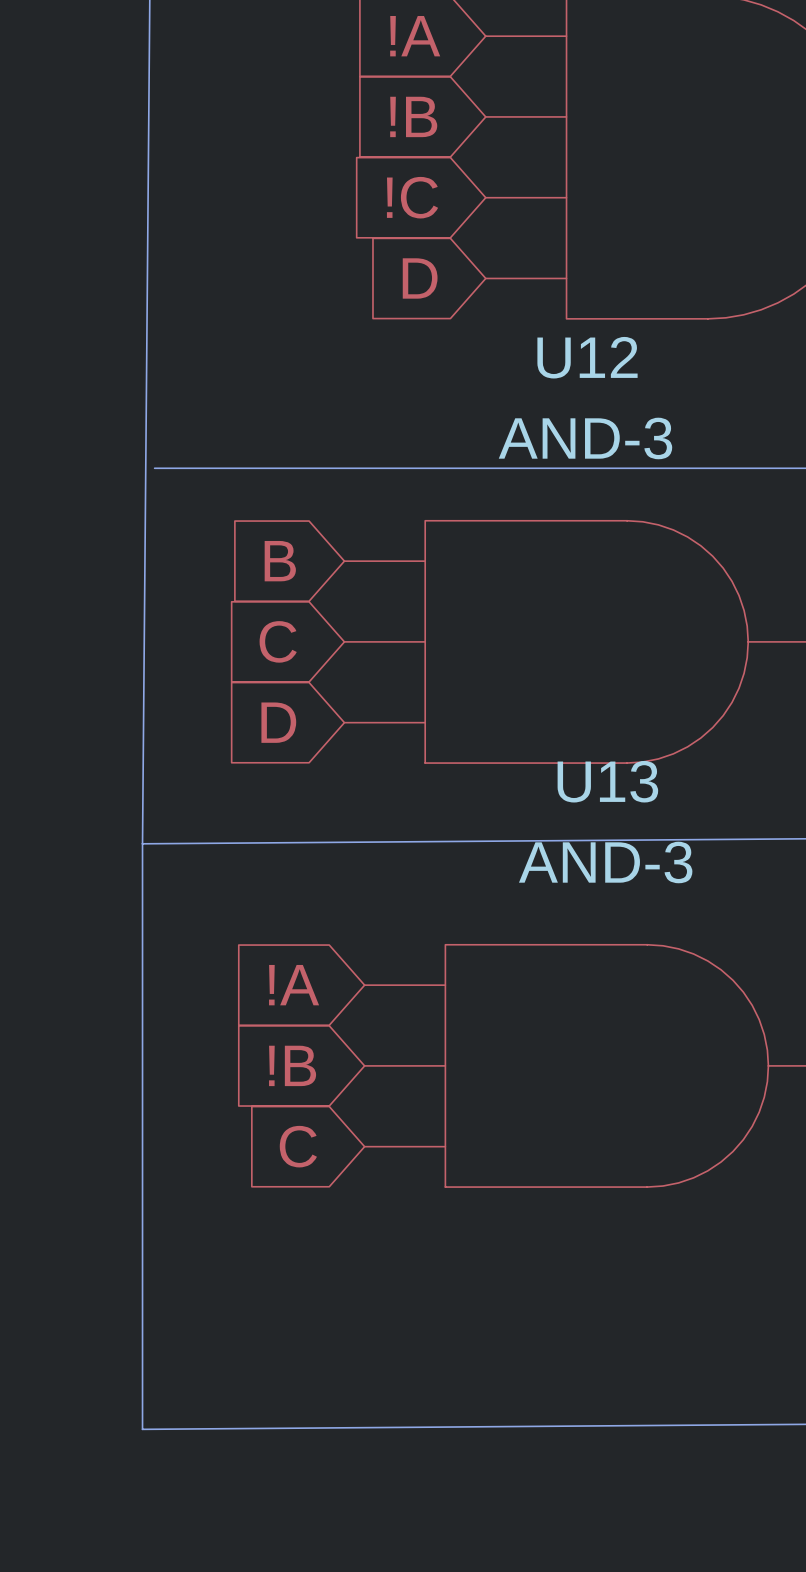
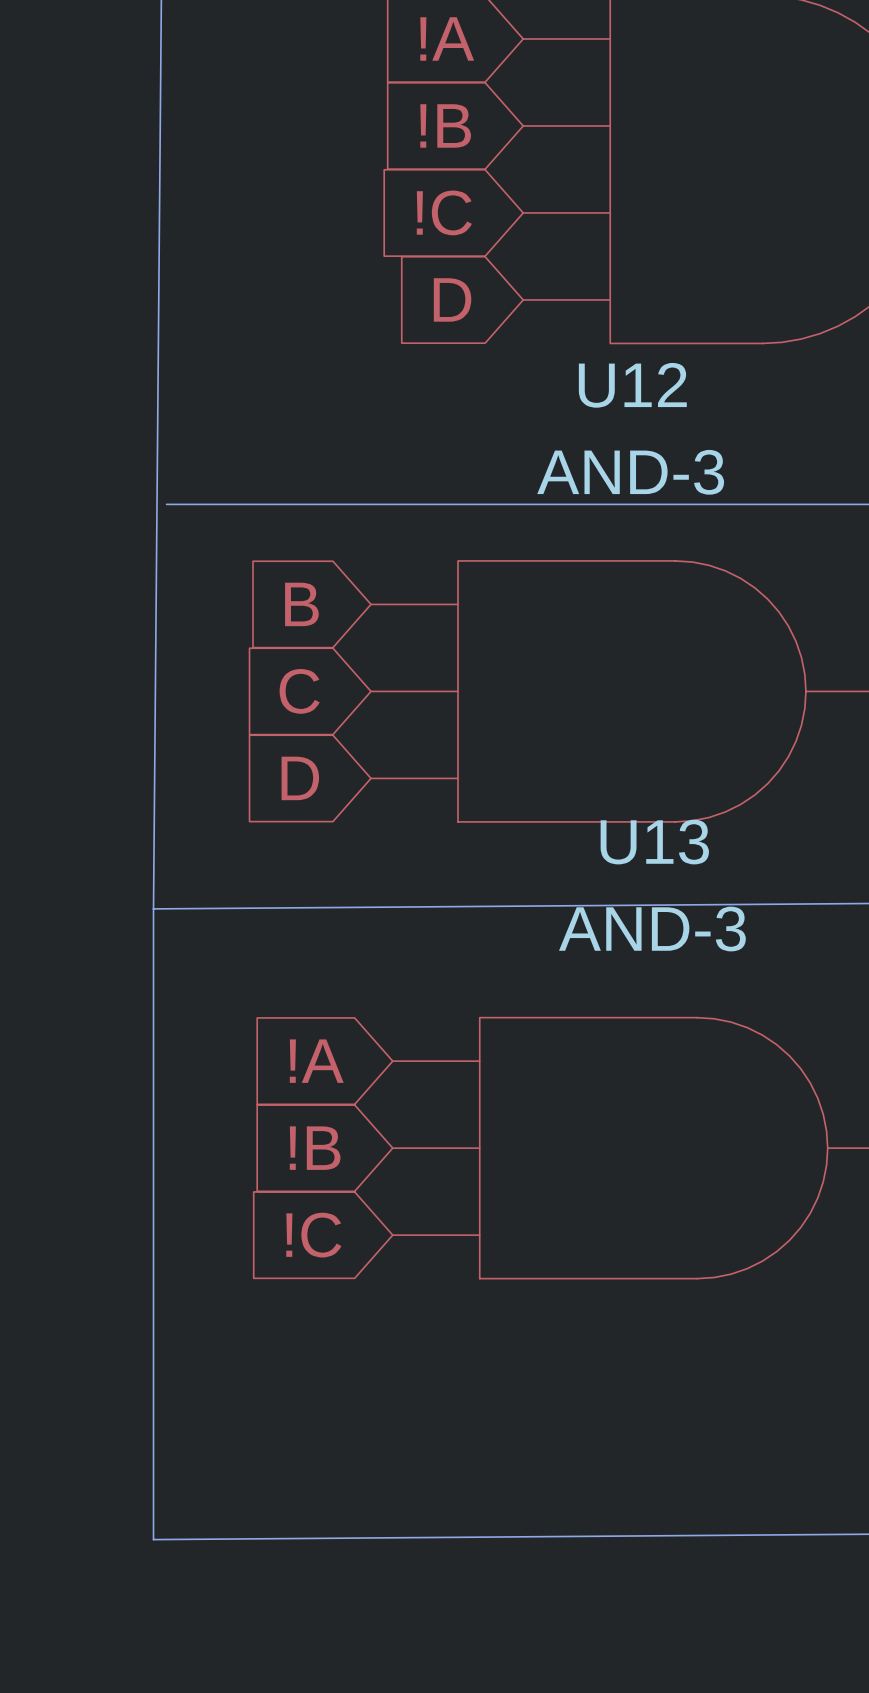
global label: C (298, 1146) -> !C (313, 1235)

